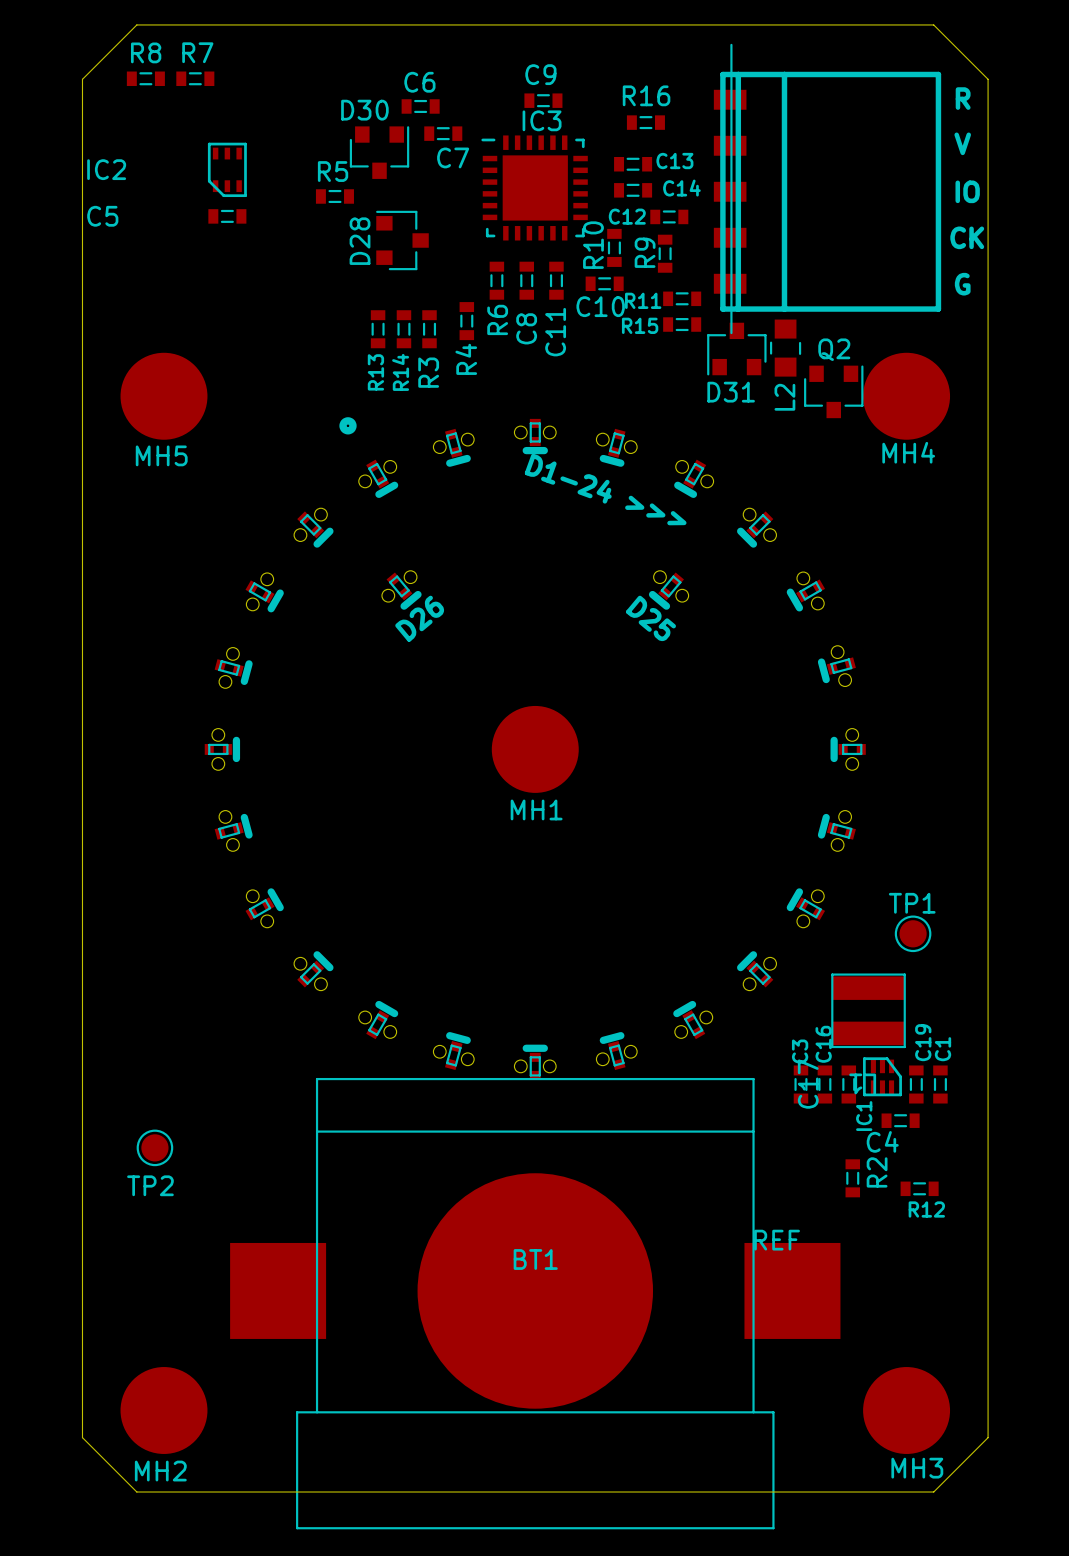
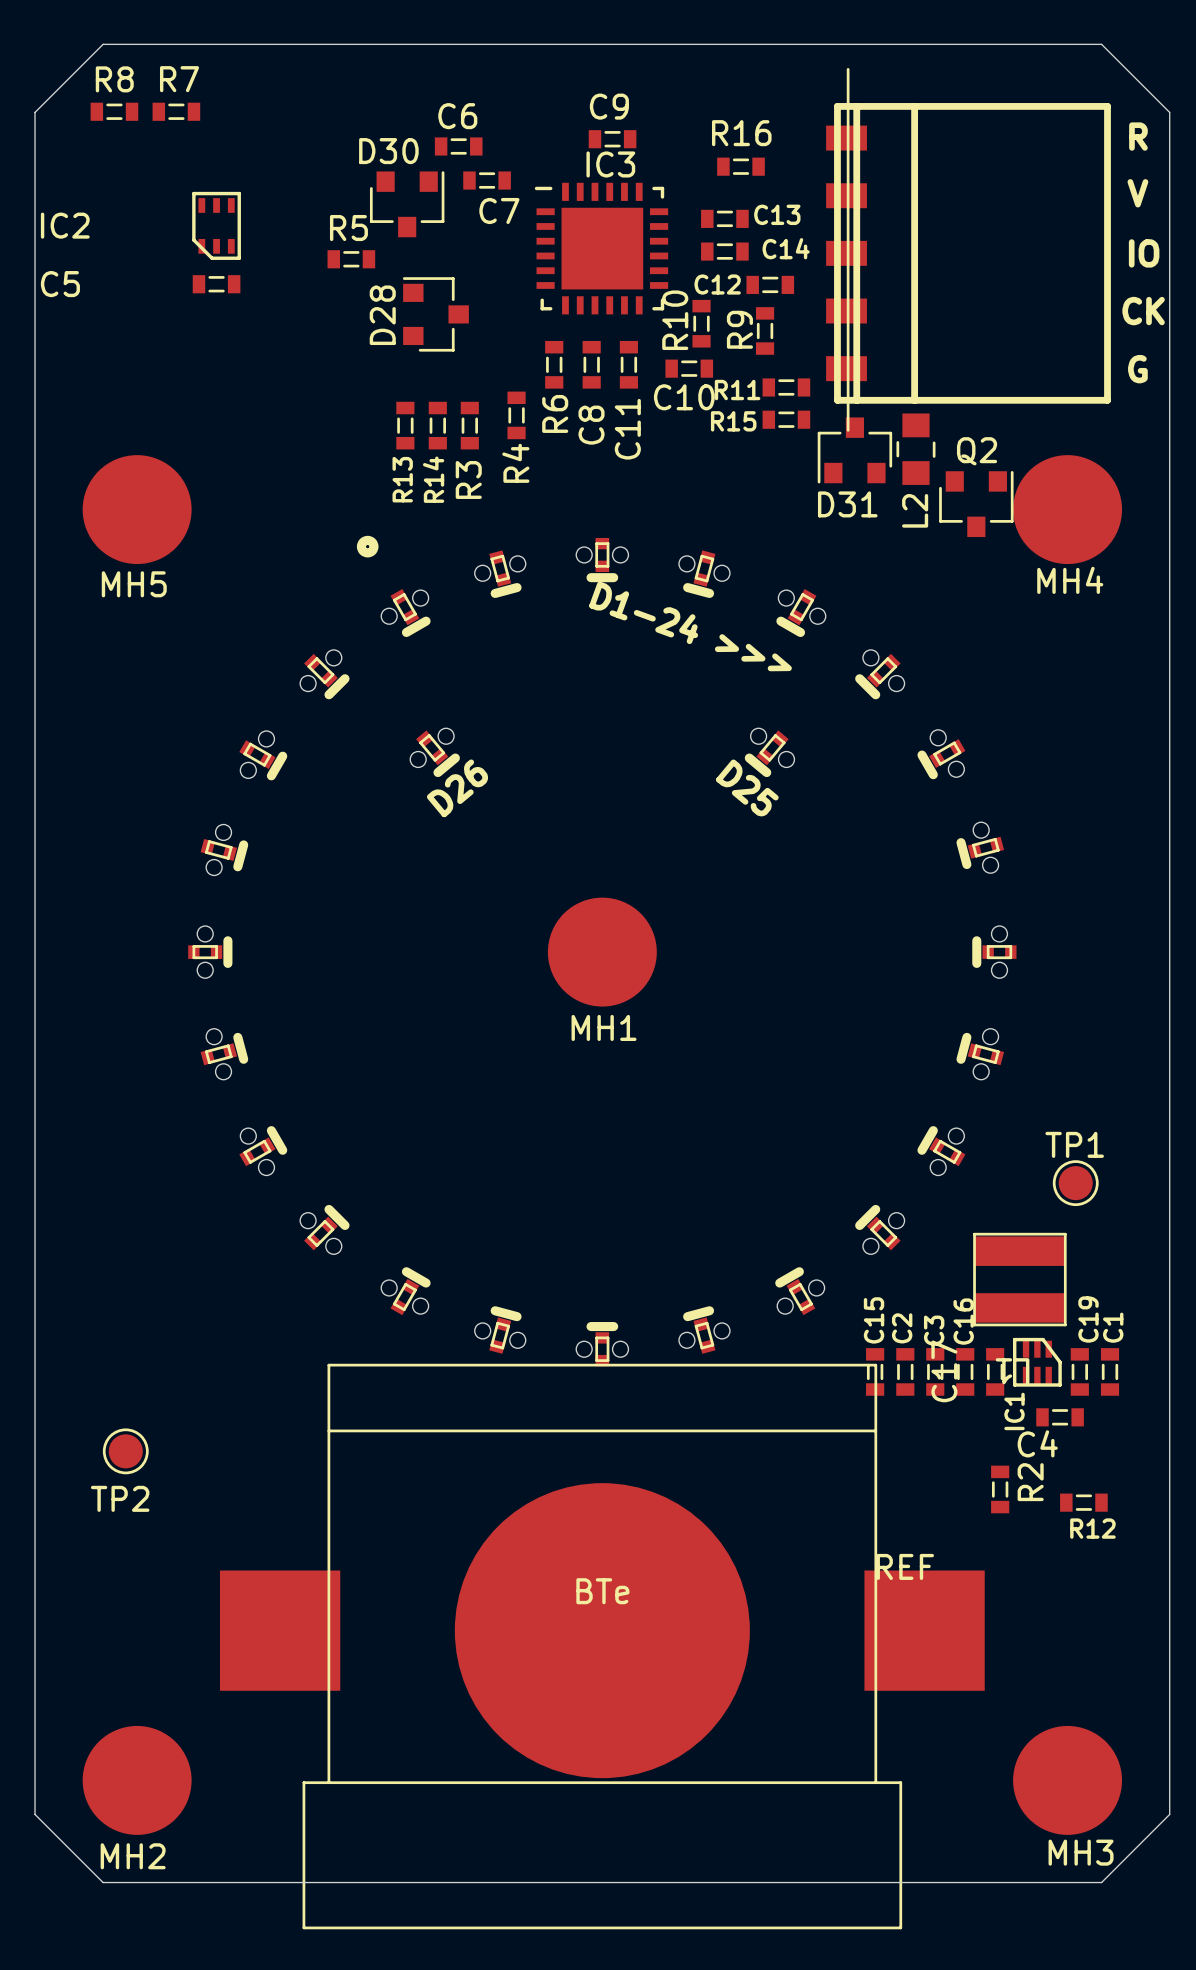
C15: none -> (875, 1371)
C2: none -> (905, 1371)
BT1 name: BT1 (535, 1259) -> BTe (602, 1591)

